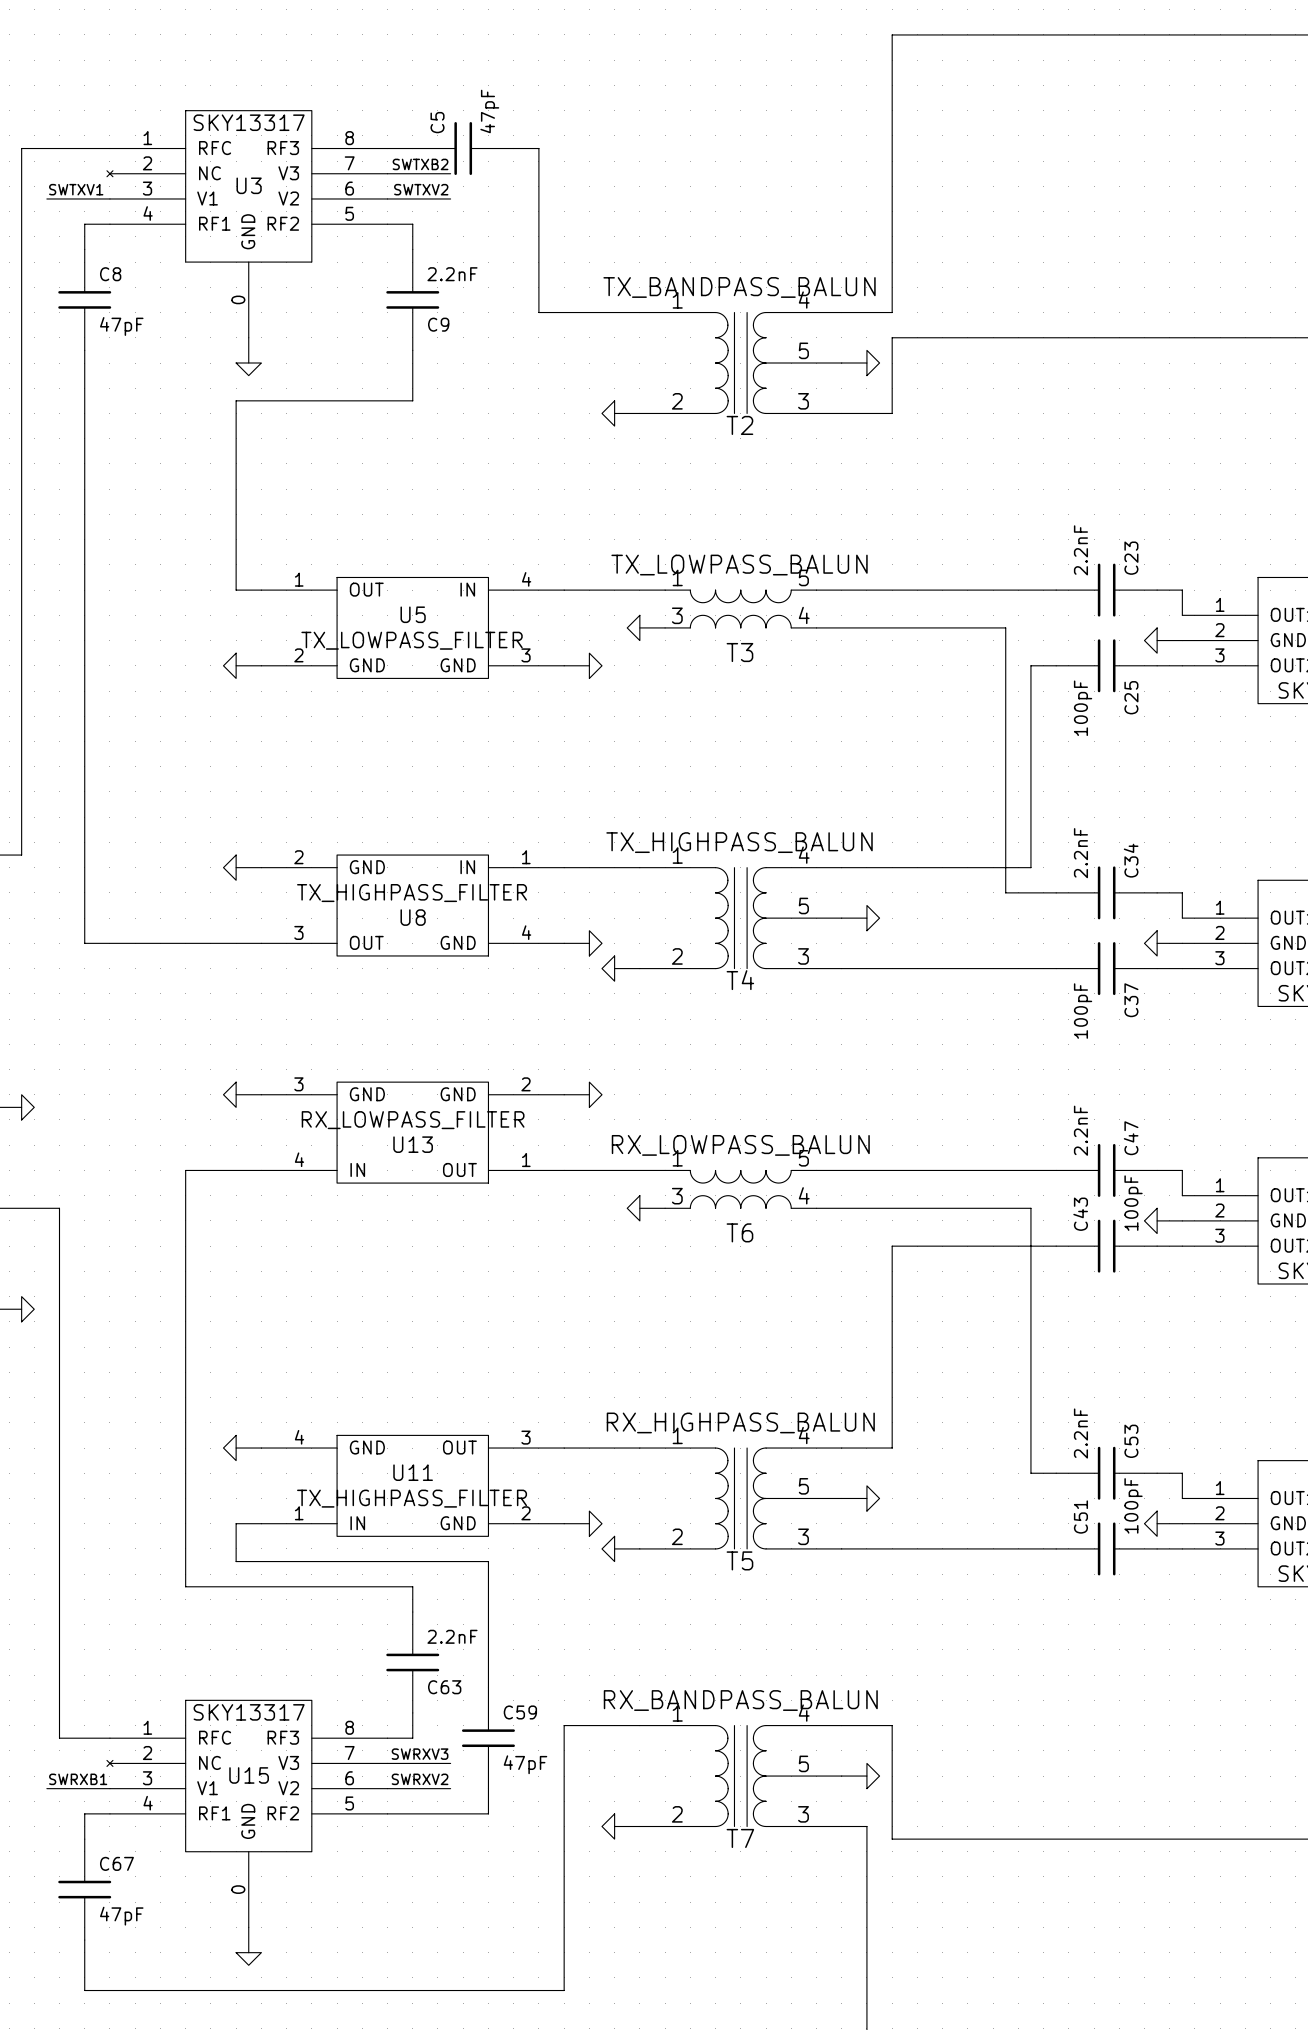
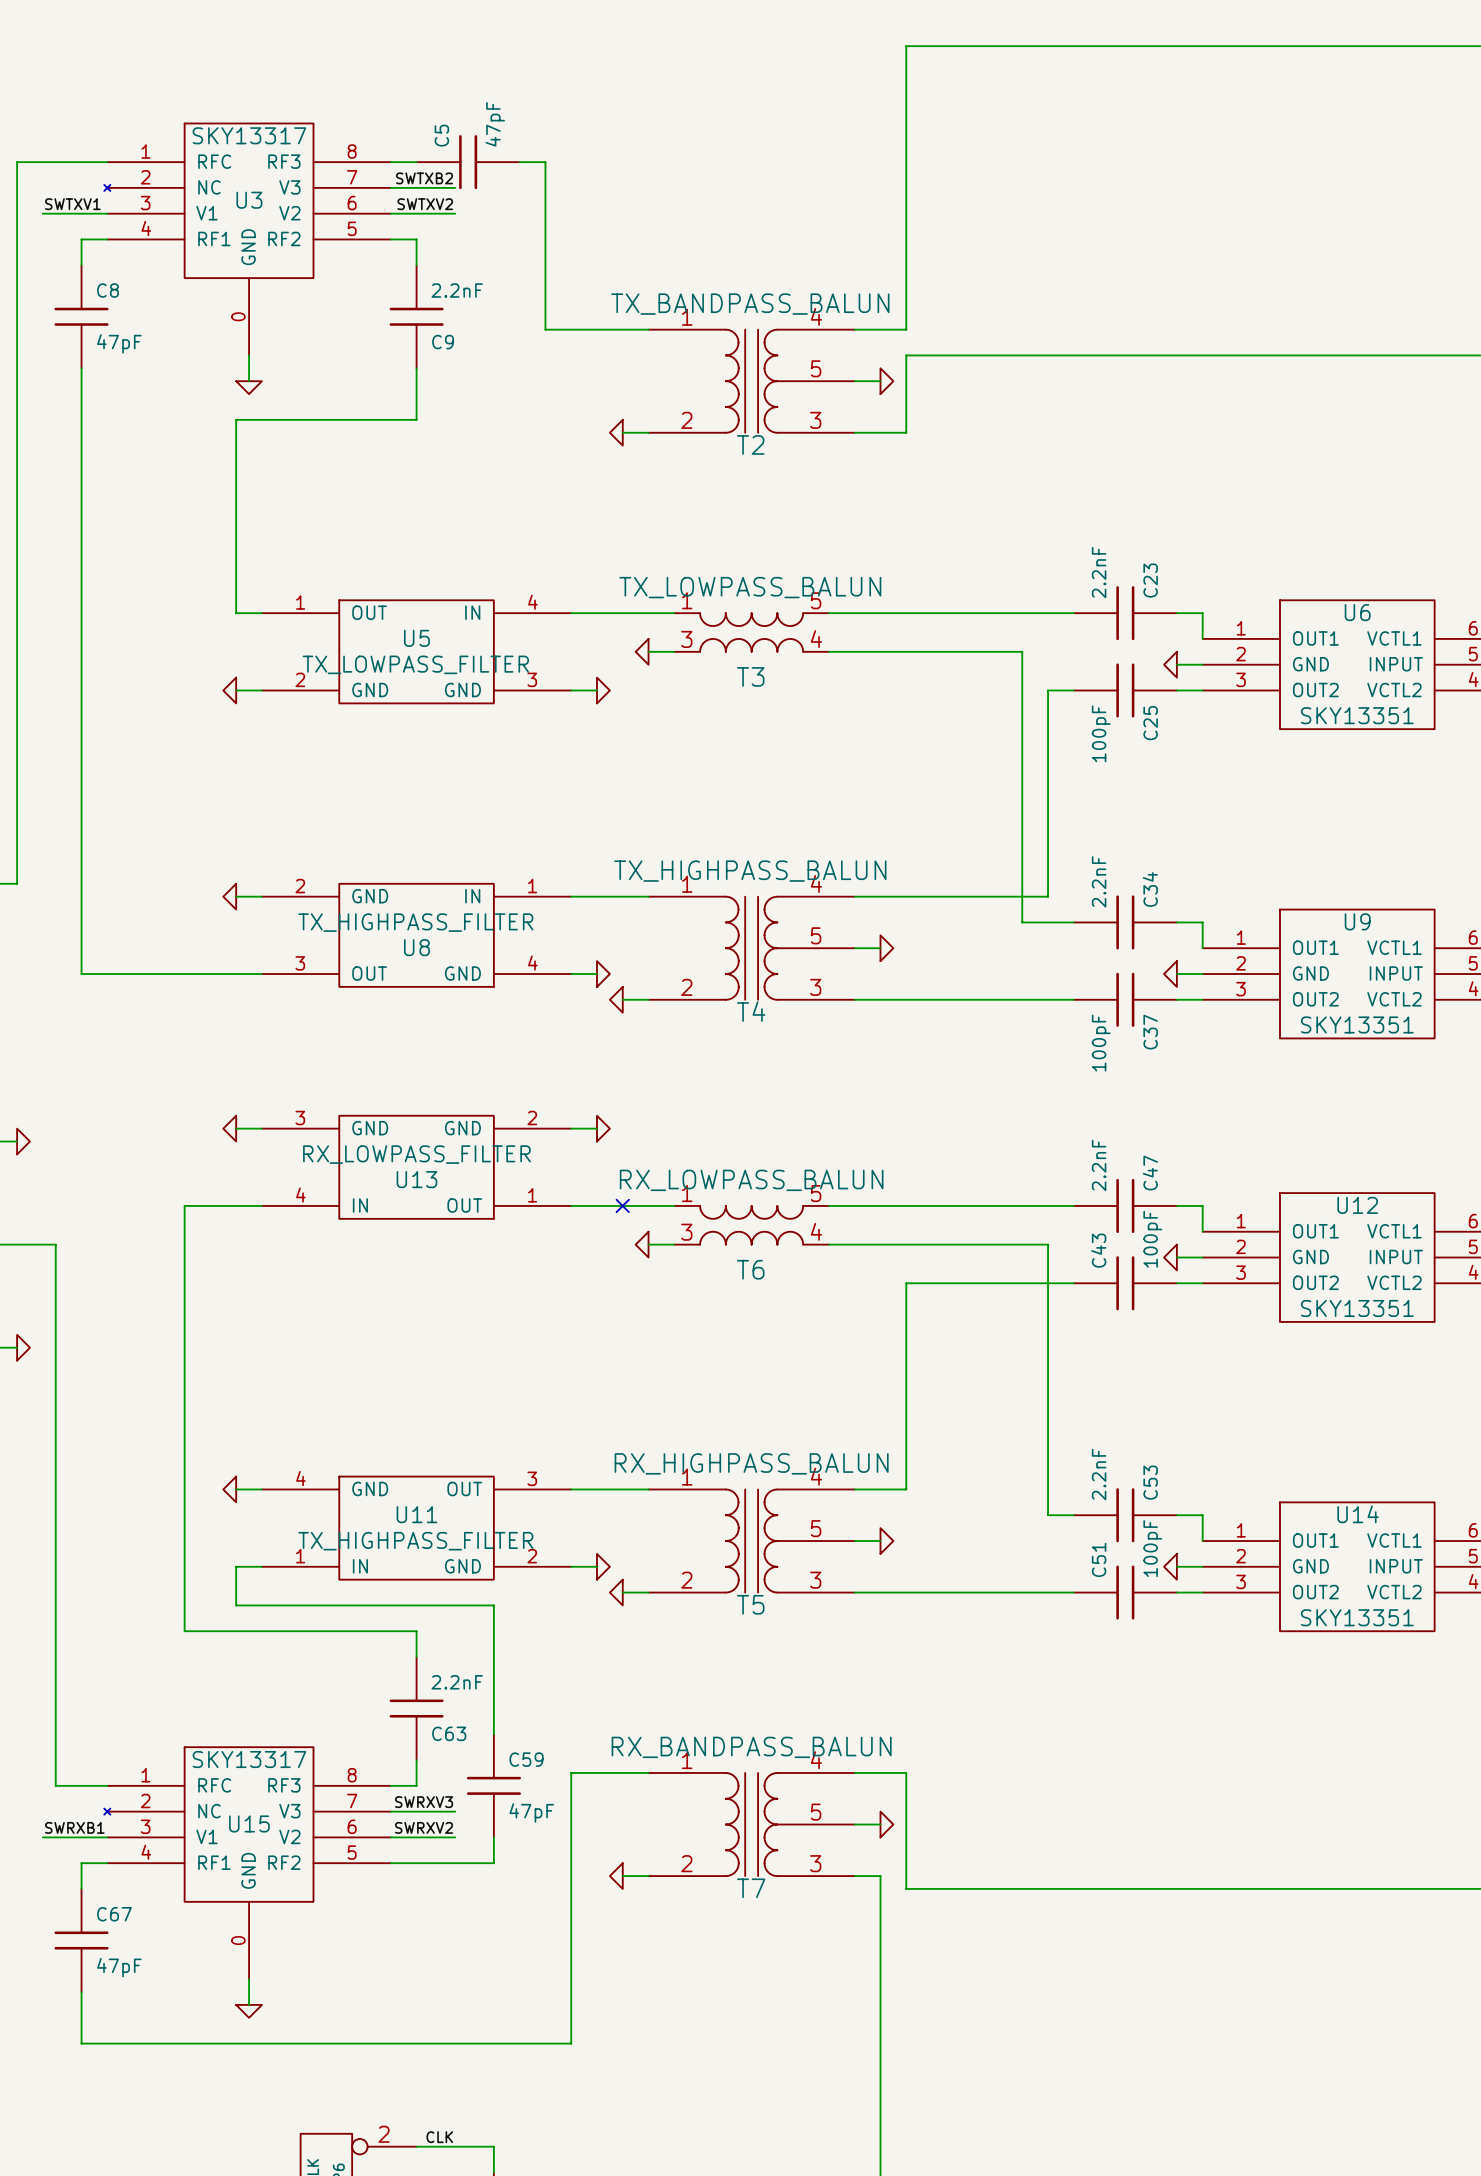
no-connect mark: none -> (622, 1205)

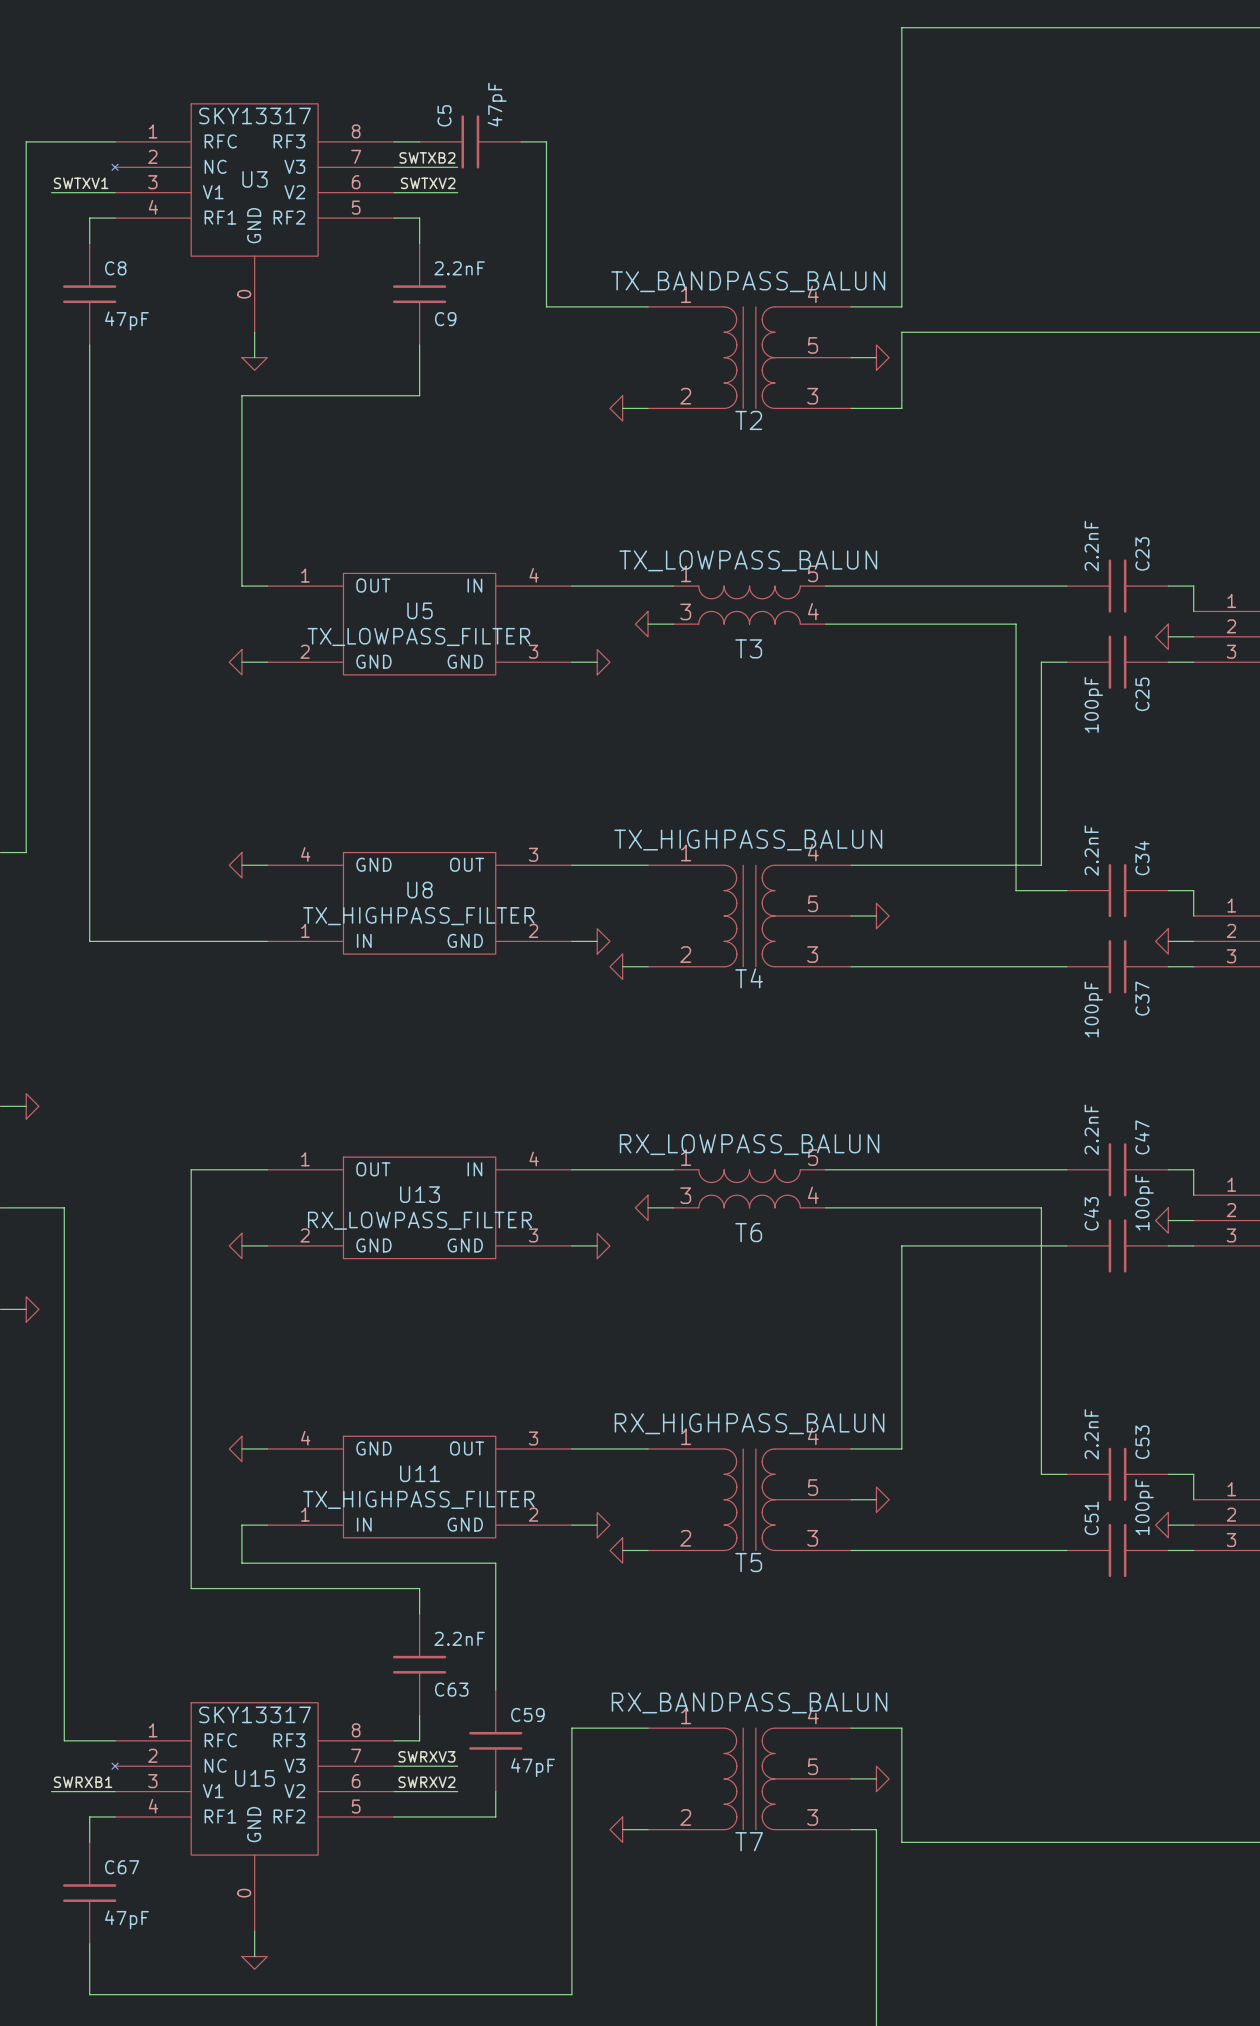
U8 rotation: 0° (416, 935) -> 180° (419, 903)
power symbol position: (229, 1128) -> (235, 1245)
wire: (236, 1128) (261, 1128) -> (241, 1245) (267, 1245)
wire: (571, 1128) (596, 1128) -> (571, 1245) (597, 1245)
power symbol position: (603, 1128) -> (603, 1245)
U13 rotation: 0° (416, 1167) -> 180° (419, 1207)
no-connect mark: (622, 1205) -> none

